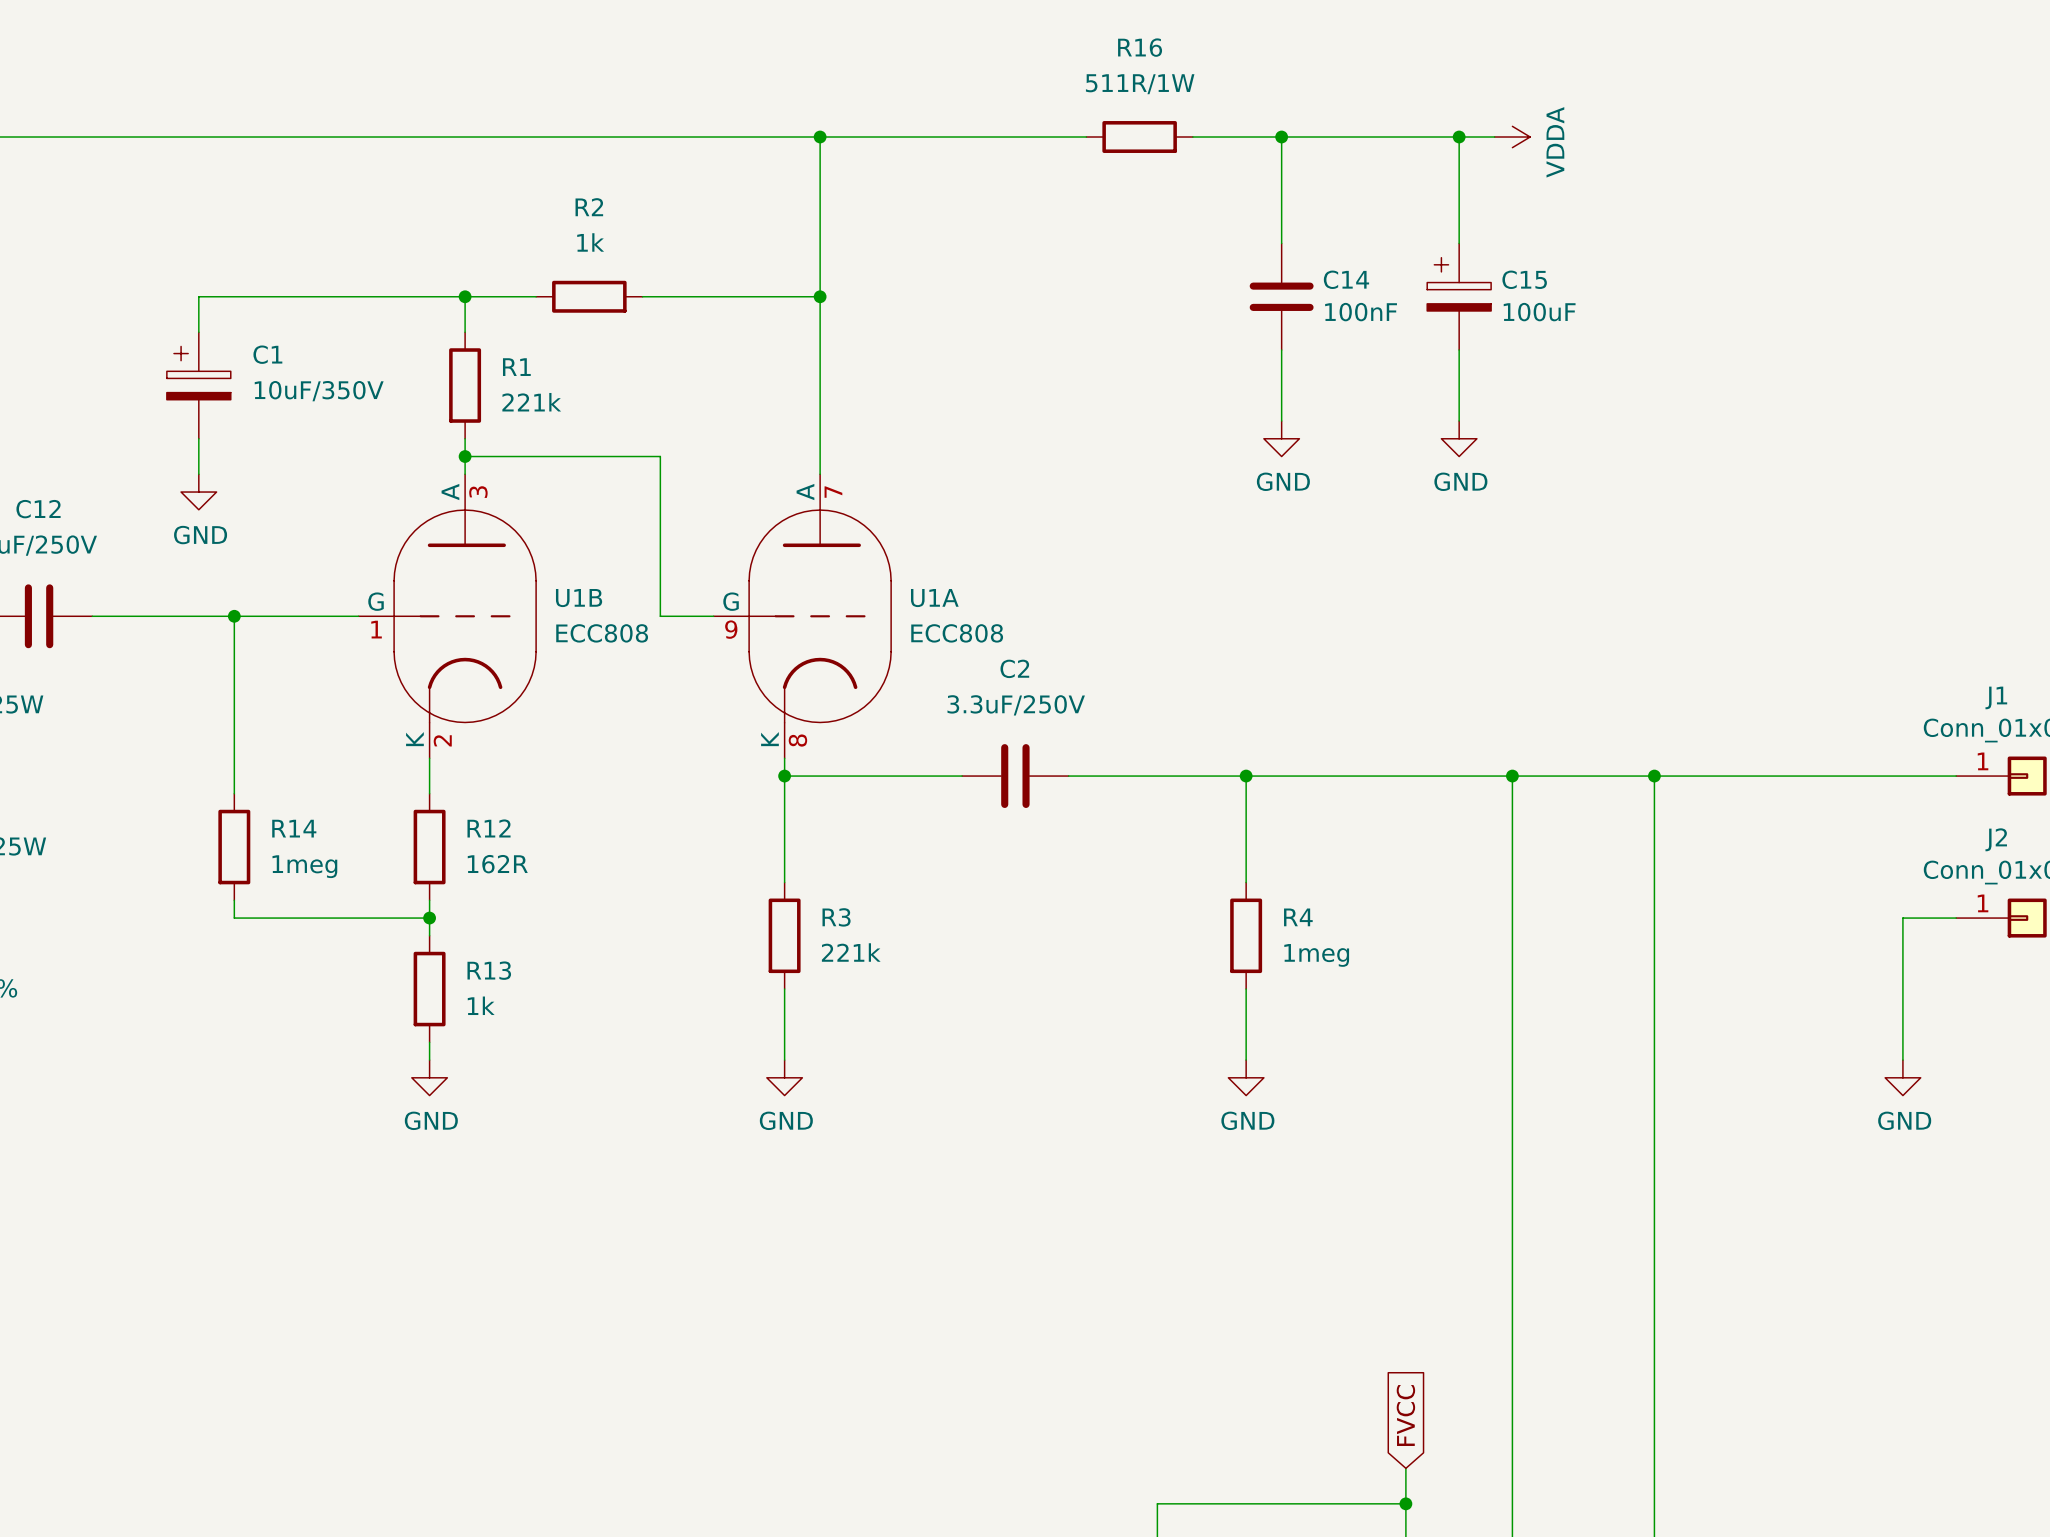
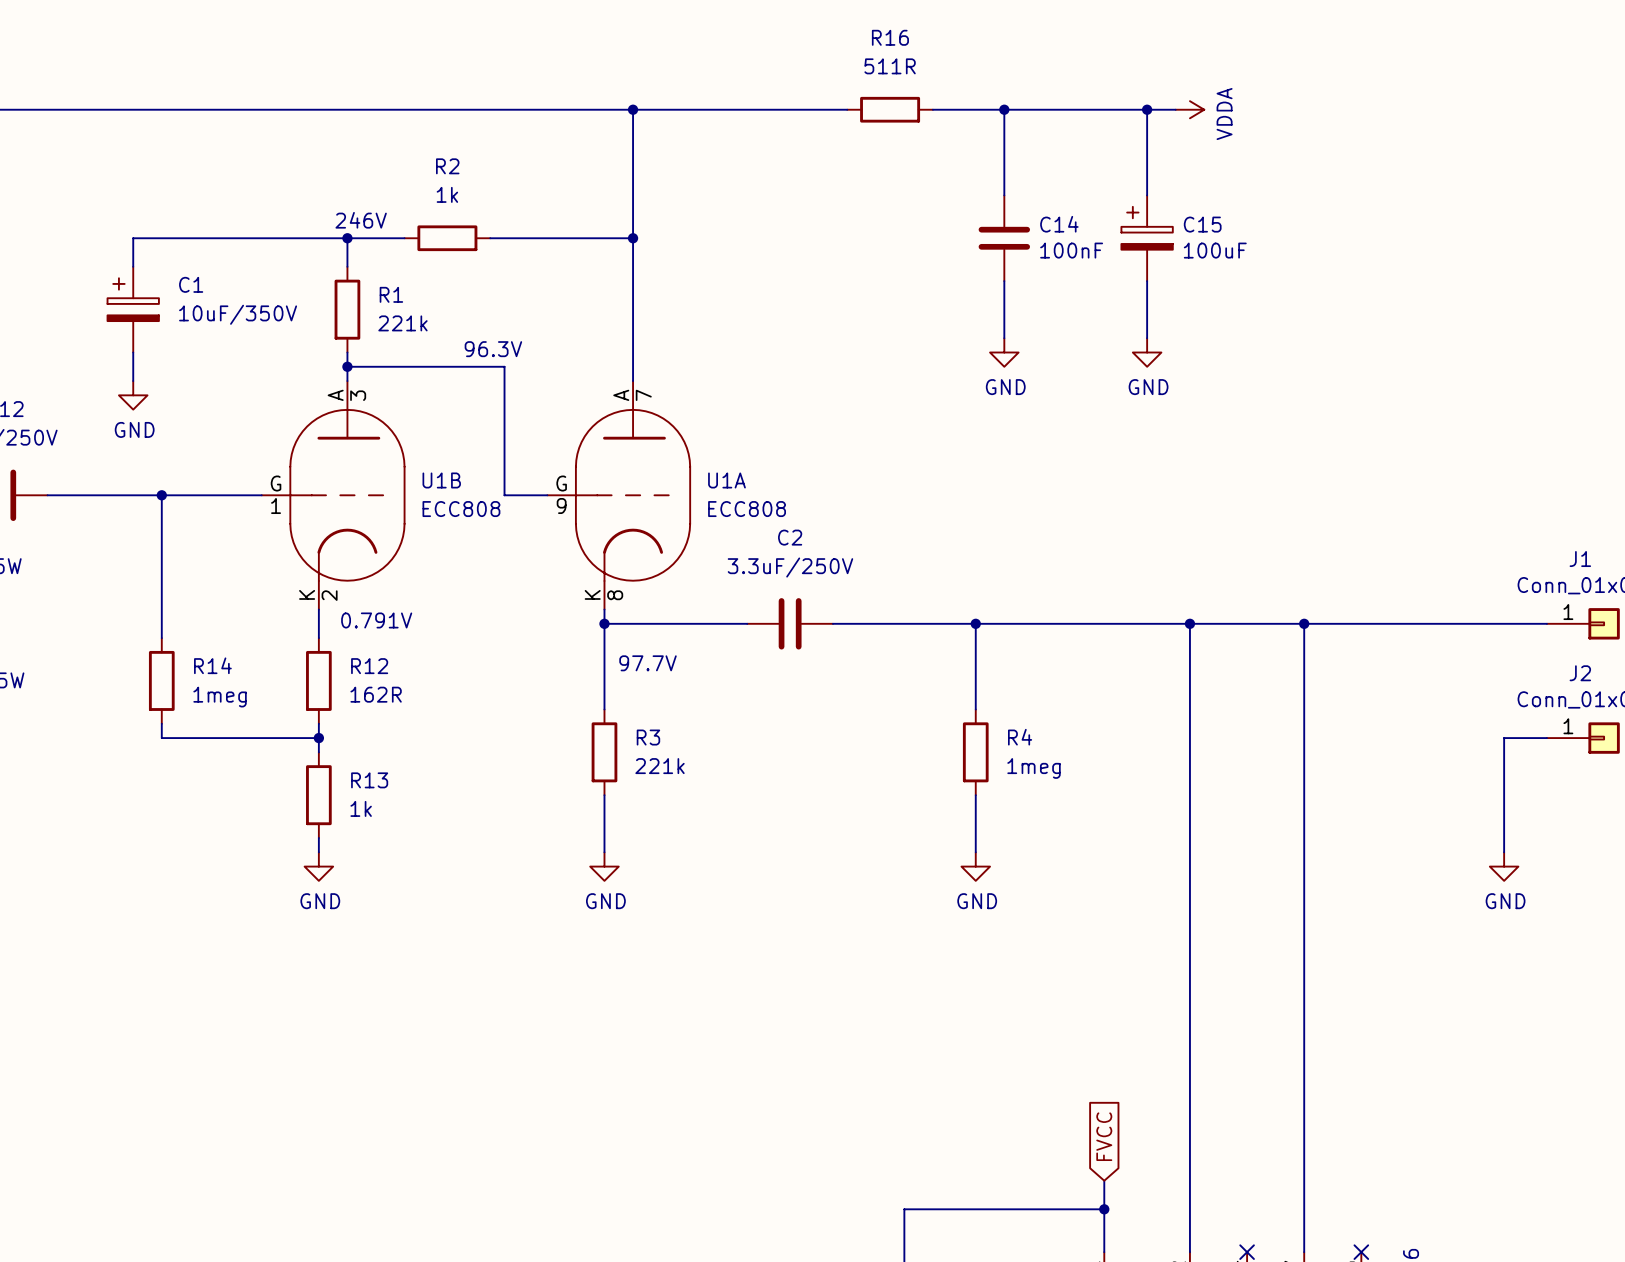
R16 value: 511R/1W (1140, 84) -> 511R (890, 66)
text: none -> 246V (361, 220)
text: none -> 96.3V (493, 349)
text: none -> 0.791V (376, 620)
text: none -> 97.7V (648, 663)

